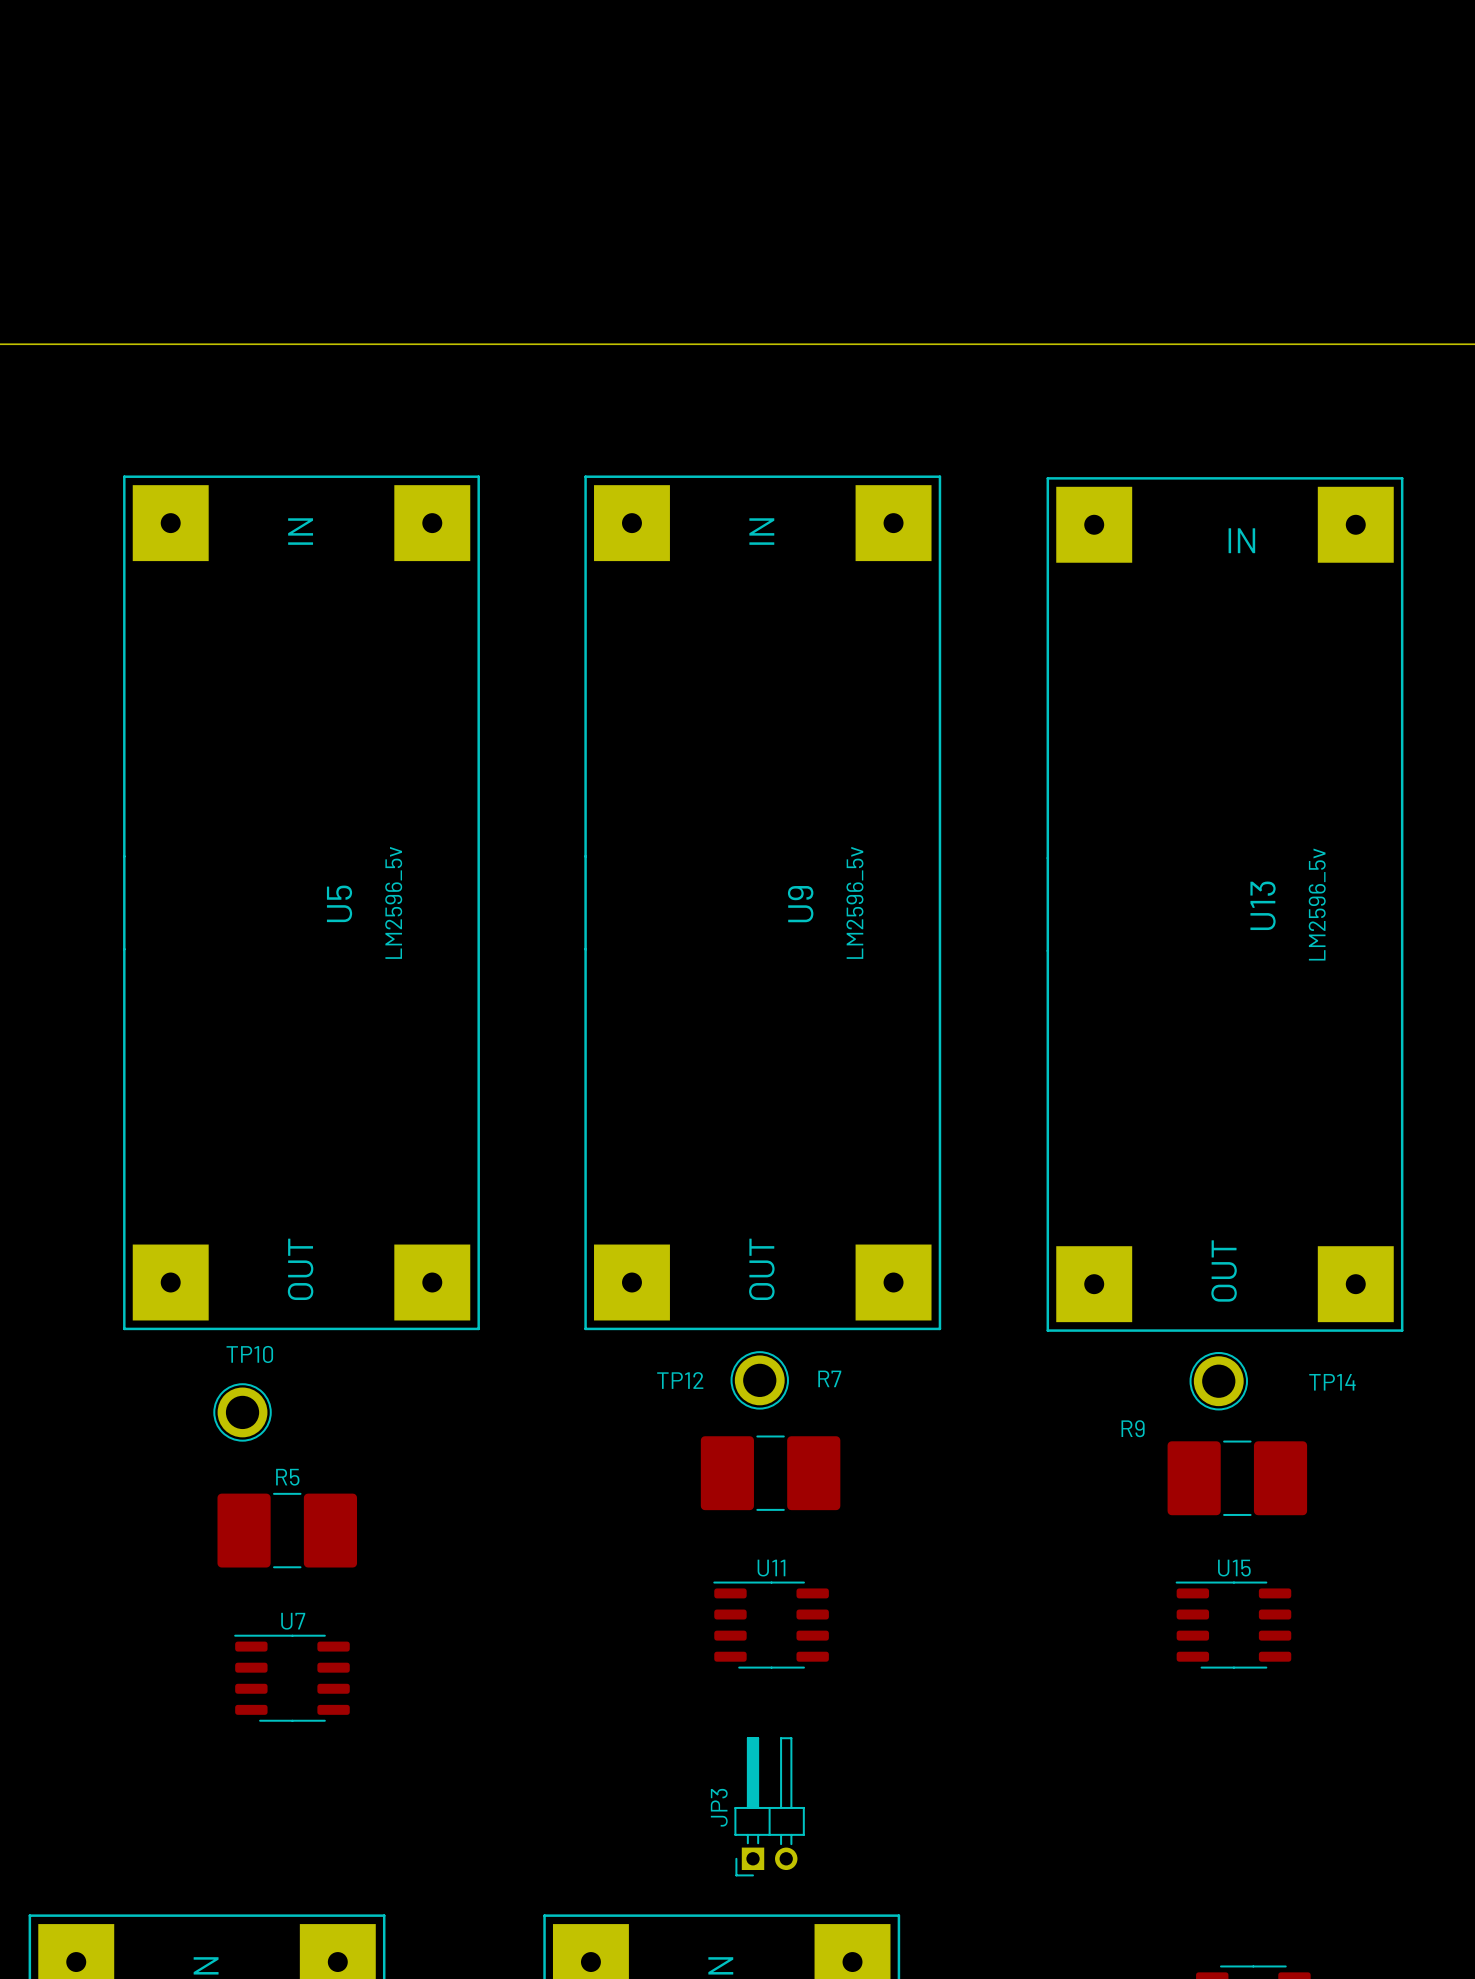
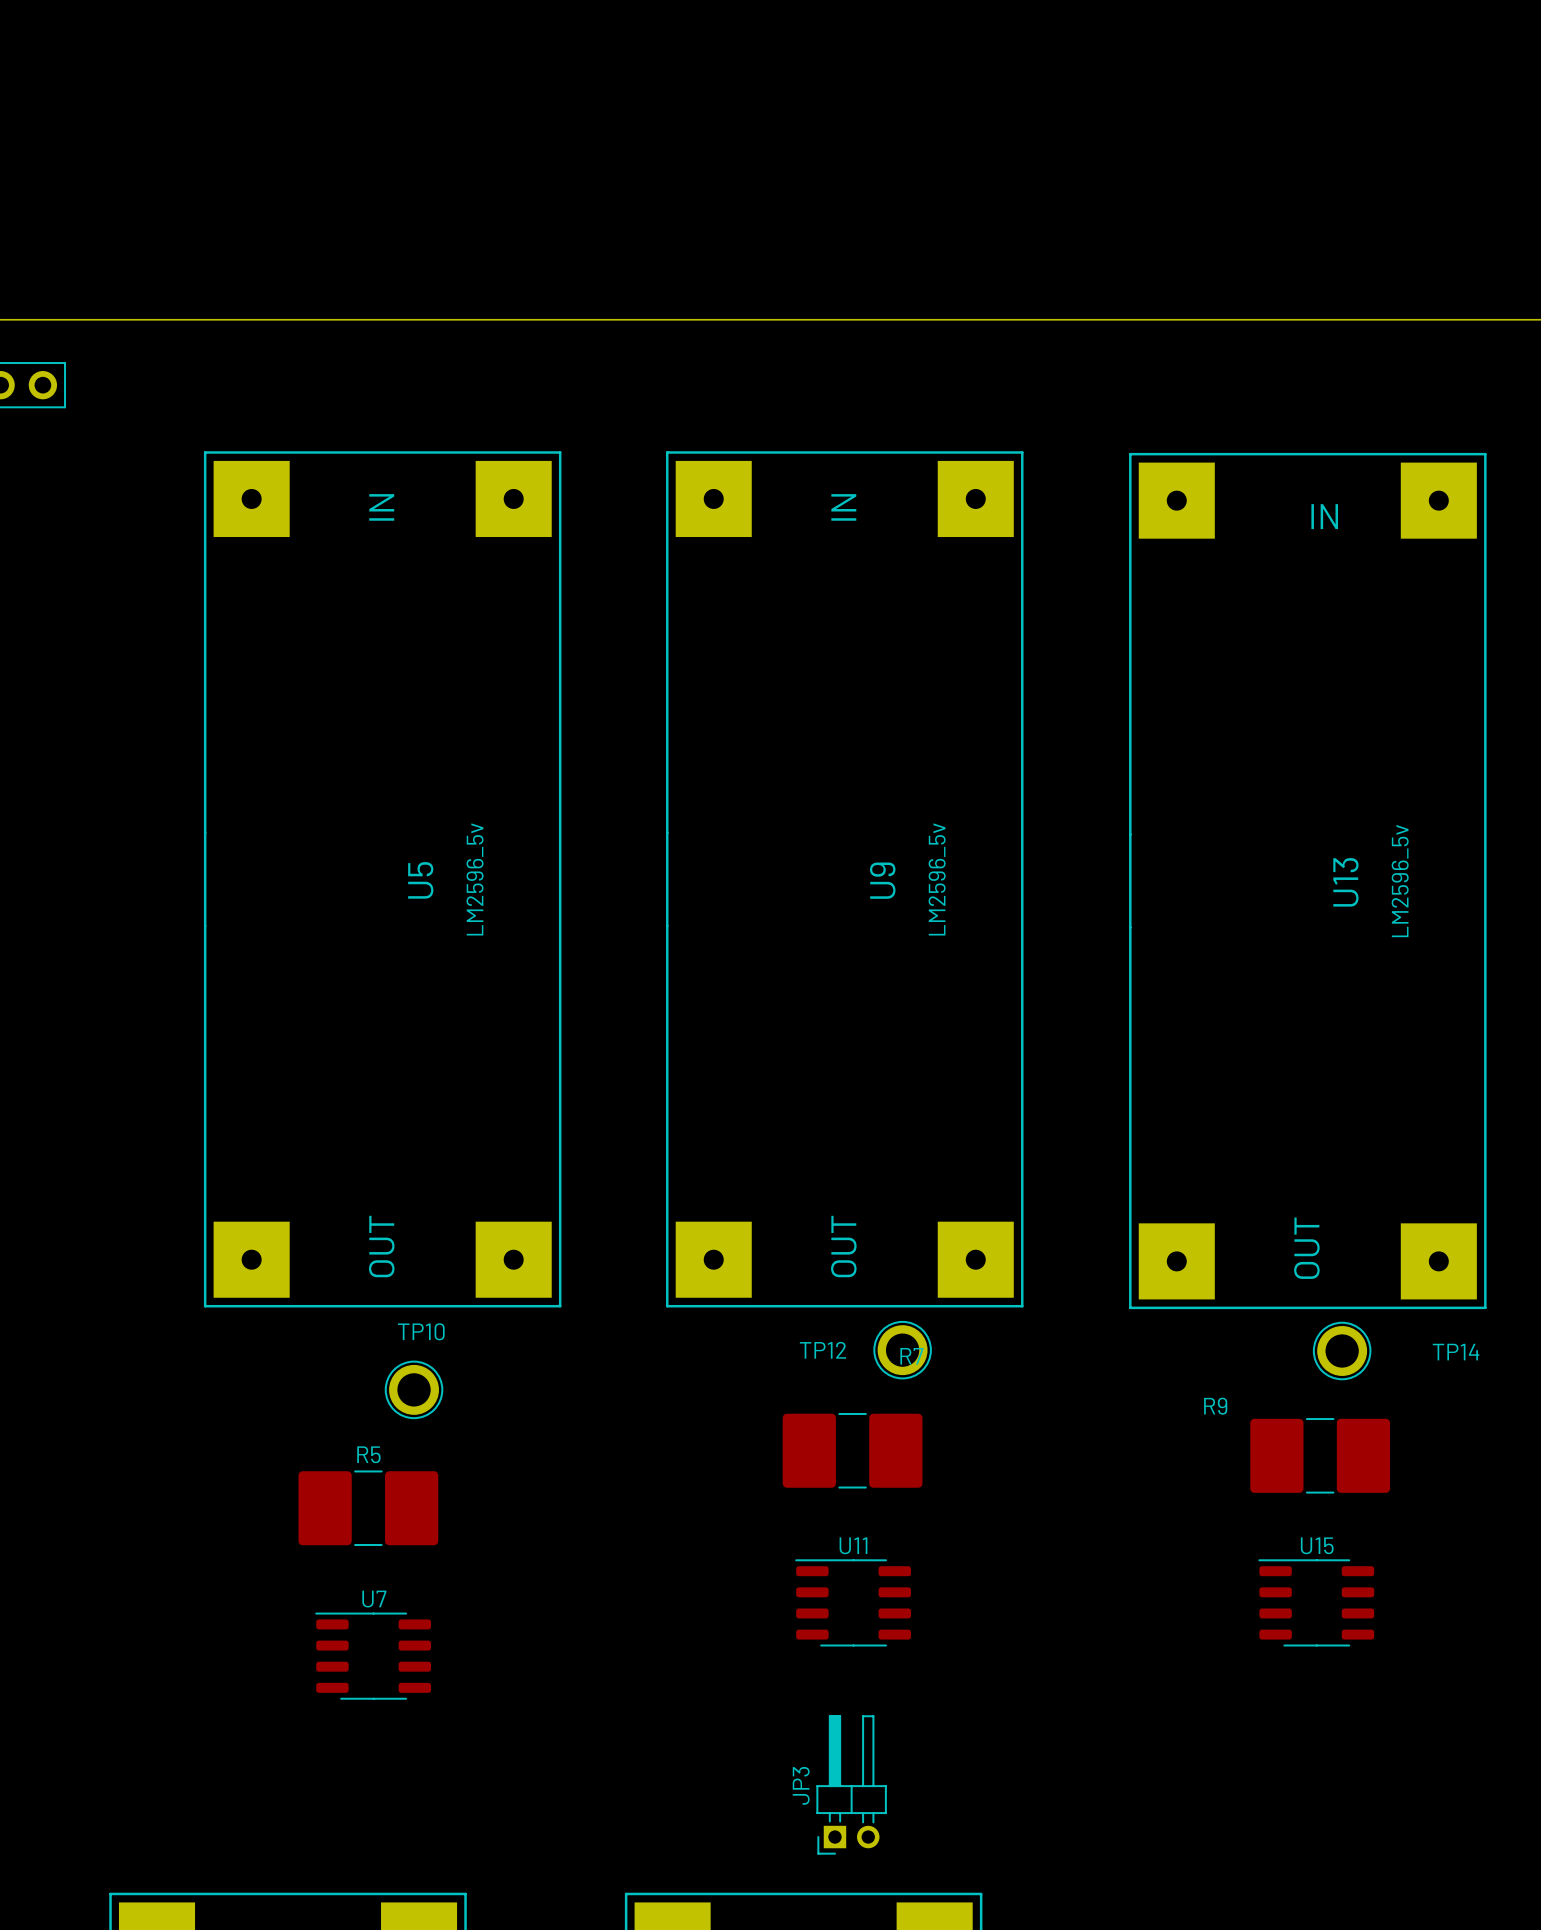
TP12 position: (759, 1380) -> (902, 1350)
TP14 position: (1218, 1381) -> (1342, 1351)
TP10 position: (242, 1412) -> (414, 1389)

